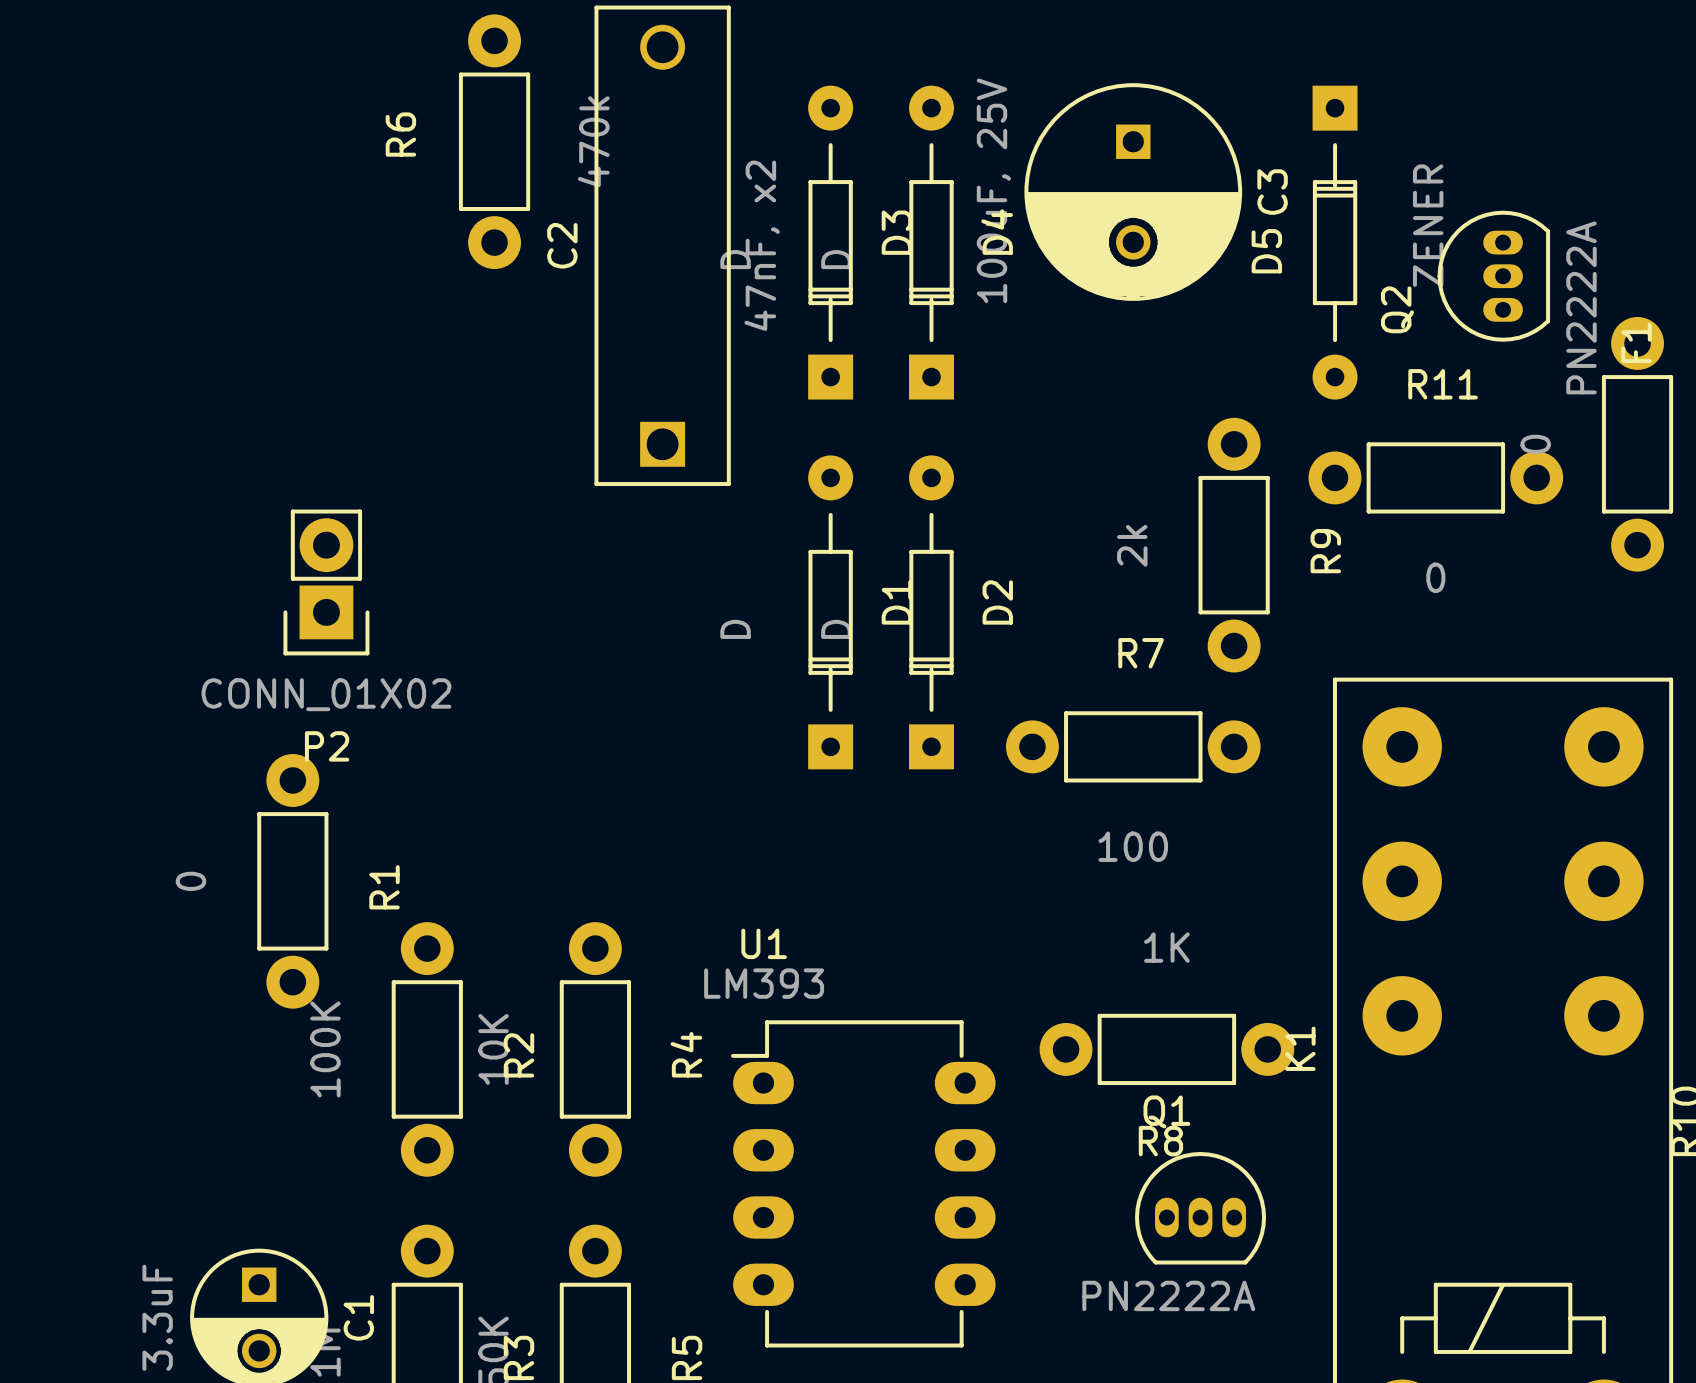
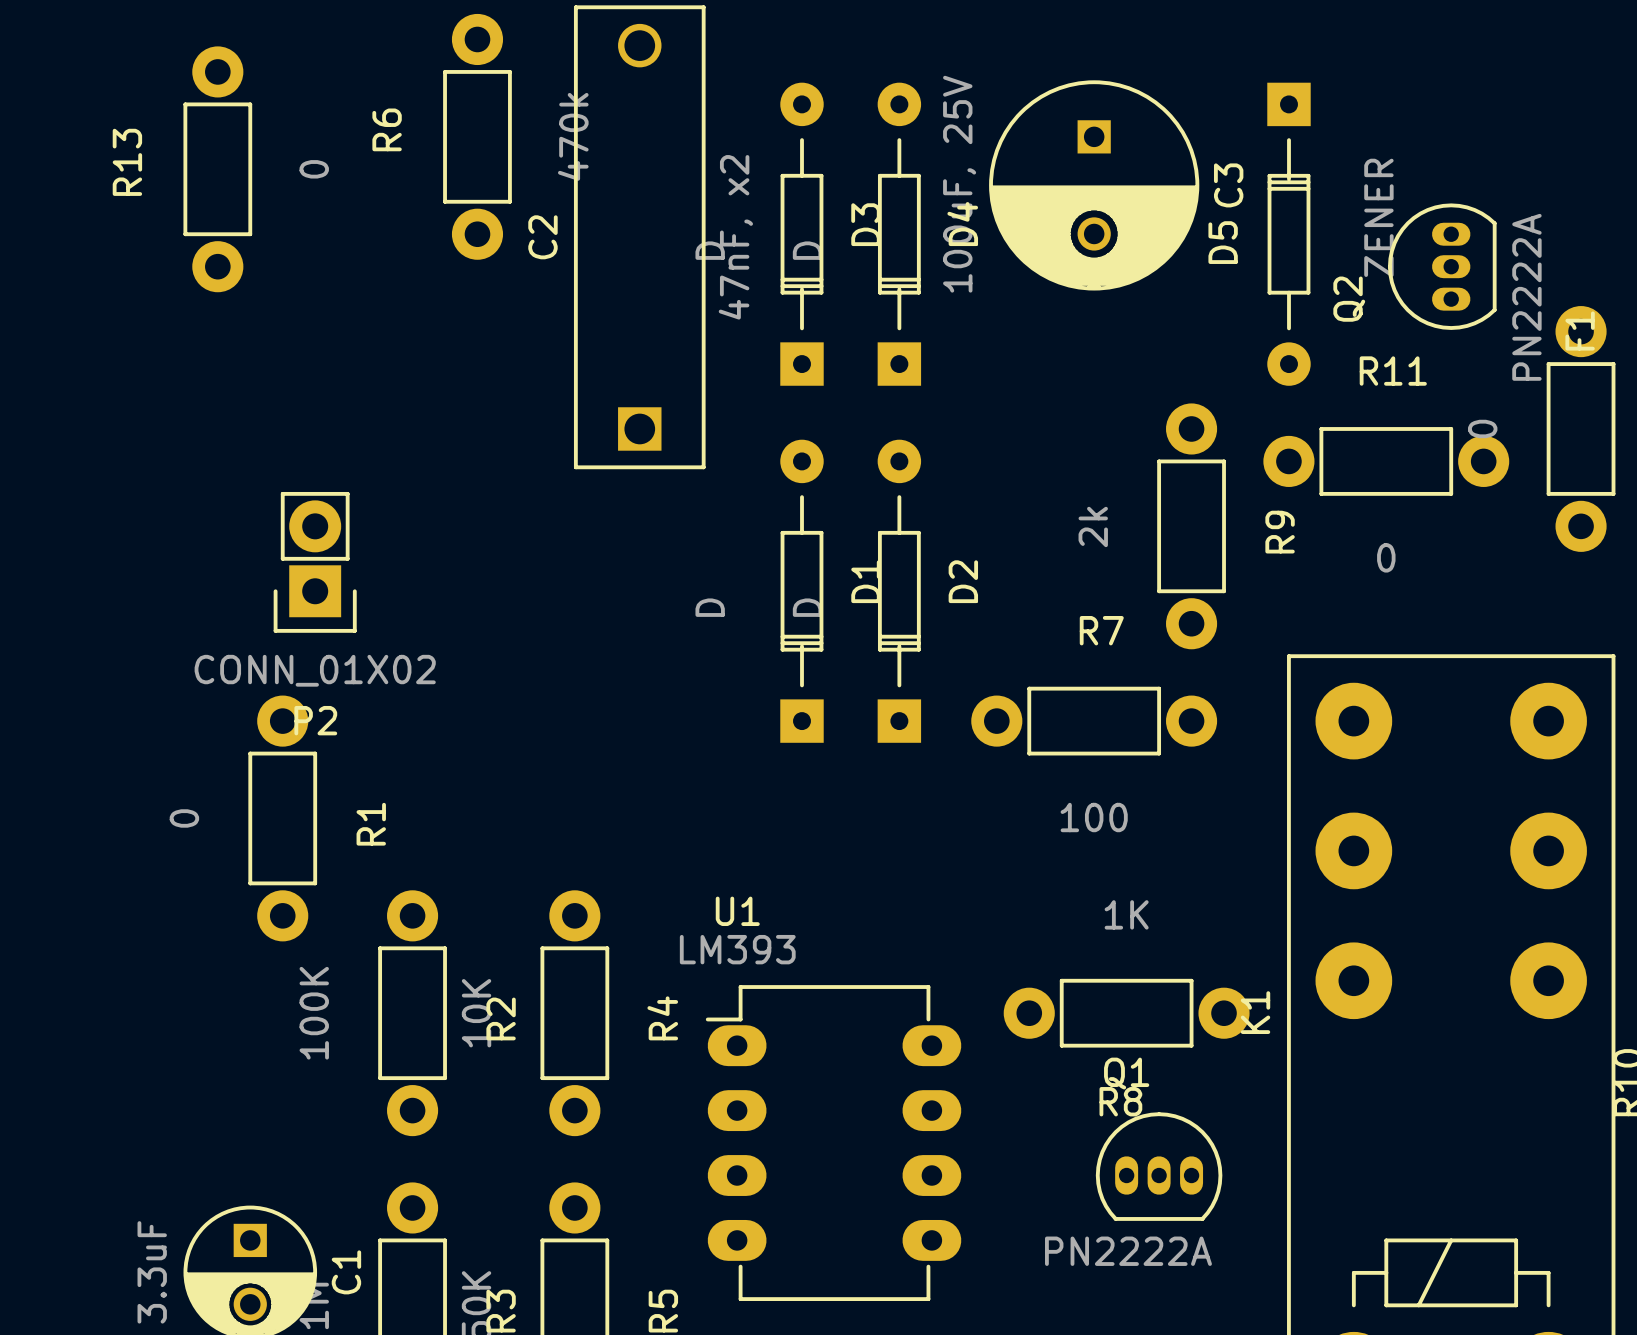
R13: none -> 0 (217, 169)
R1 position: (292, 881) -> (282, 818)

